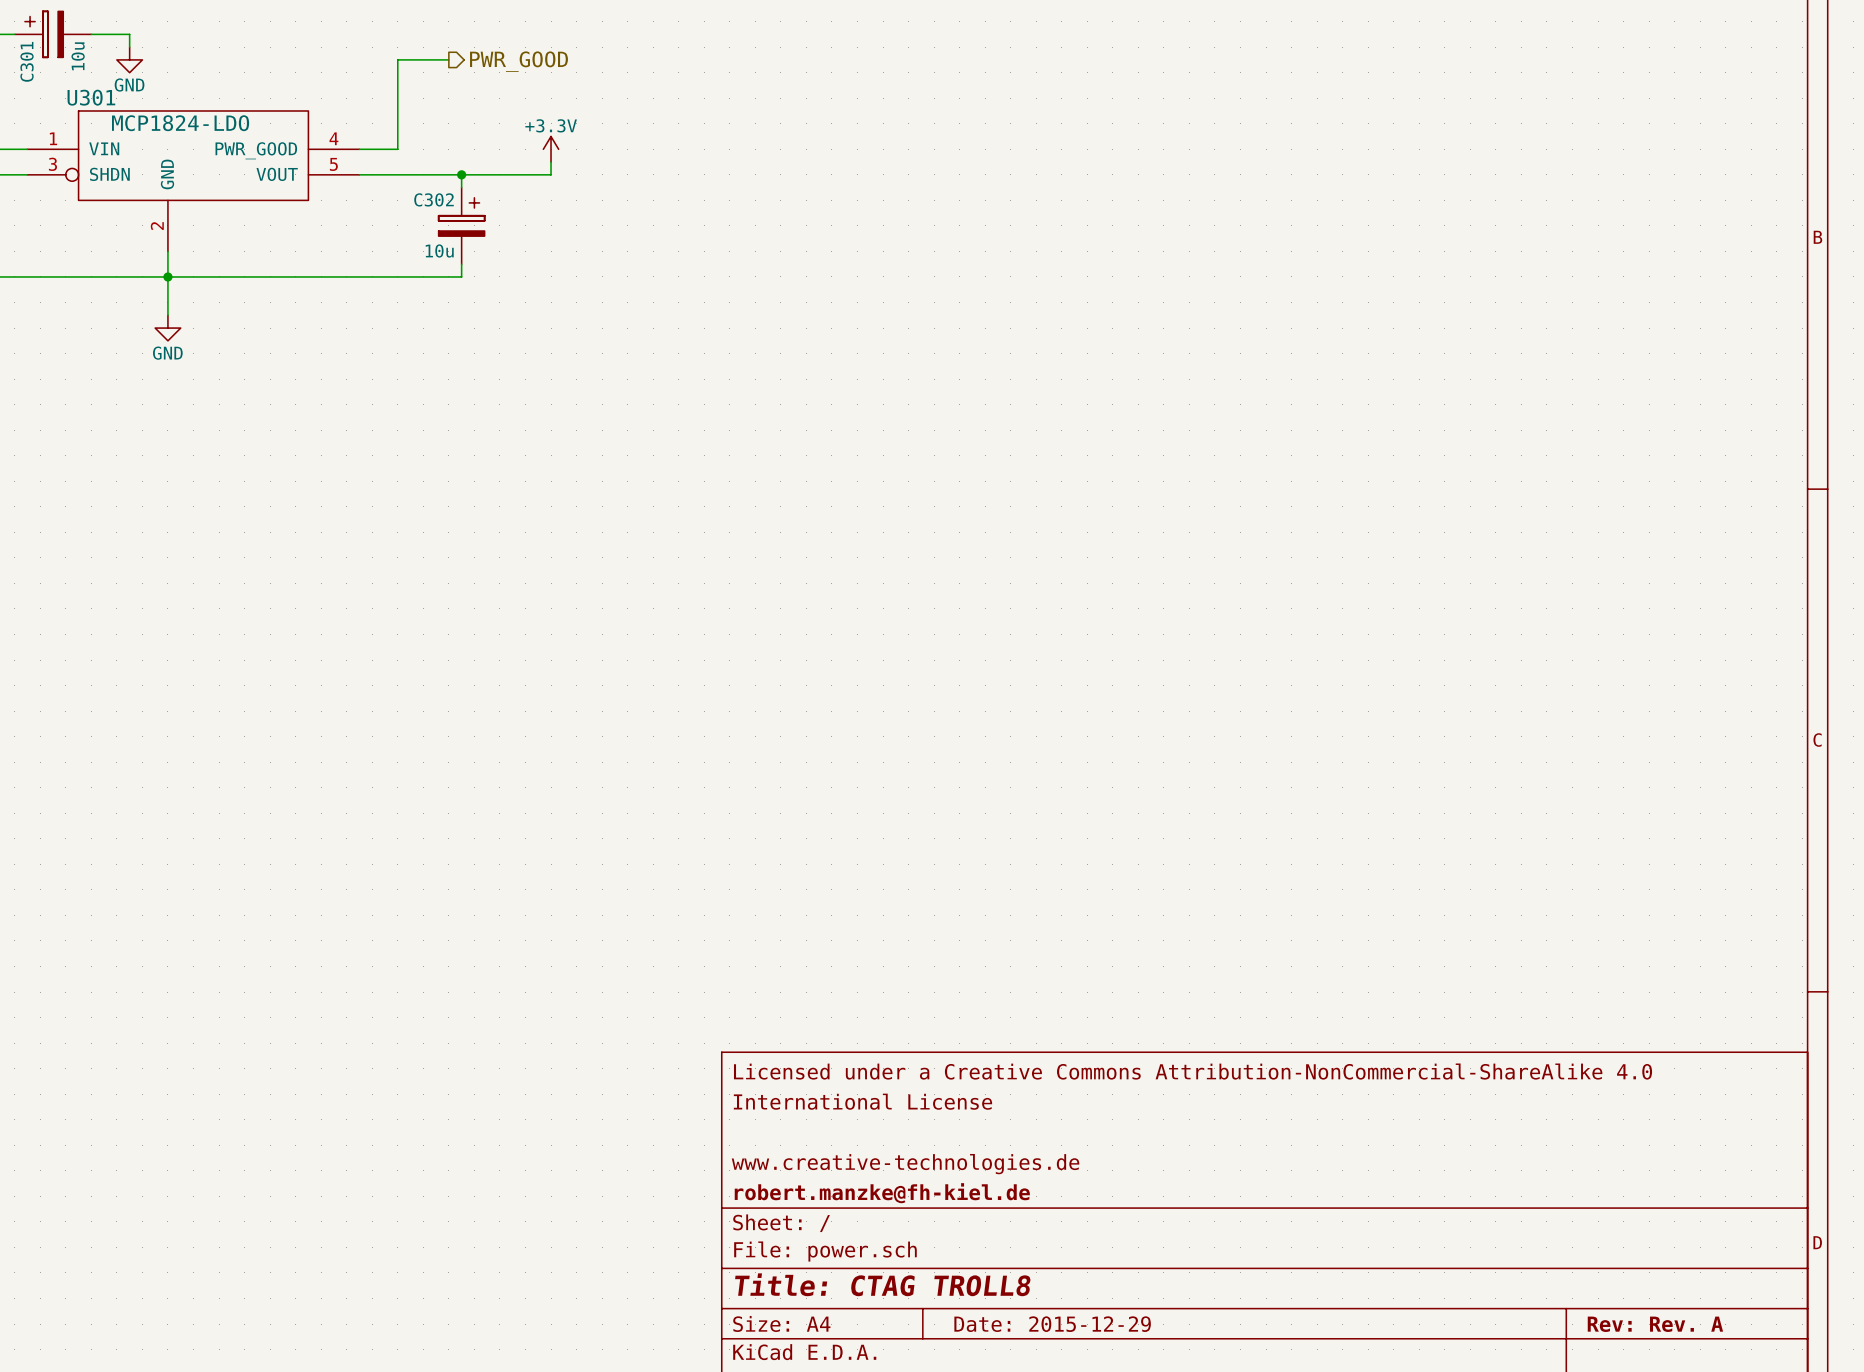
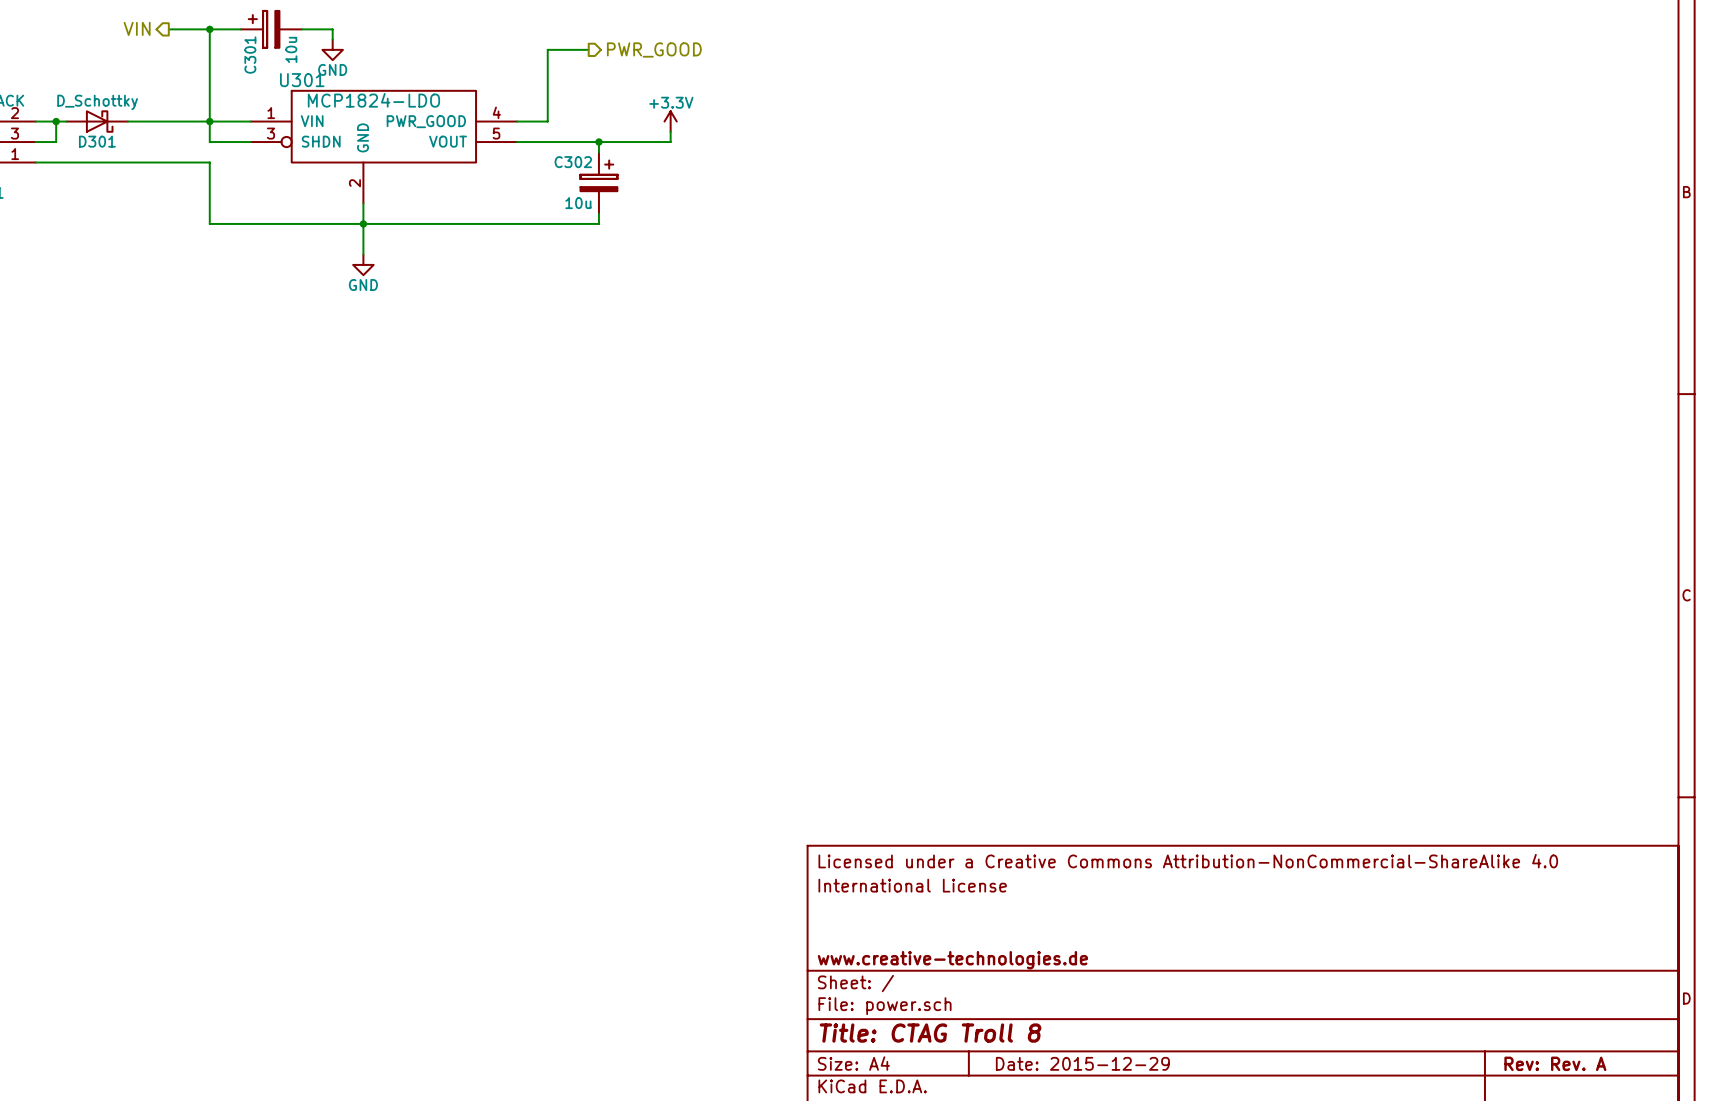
title block: www.creative-technologies.de (905, 1164) -> none
title block: robert.manzke@fh-kiel.de (882, 1193) -> www.creative-technologies.de (952, 960)
title block: Title: CTAG TROLL8 (882, 1284) -> Title: CTAG Troll 8 (930, 1033)

